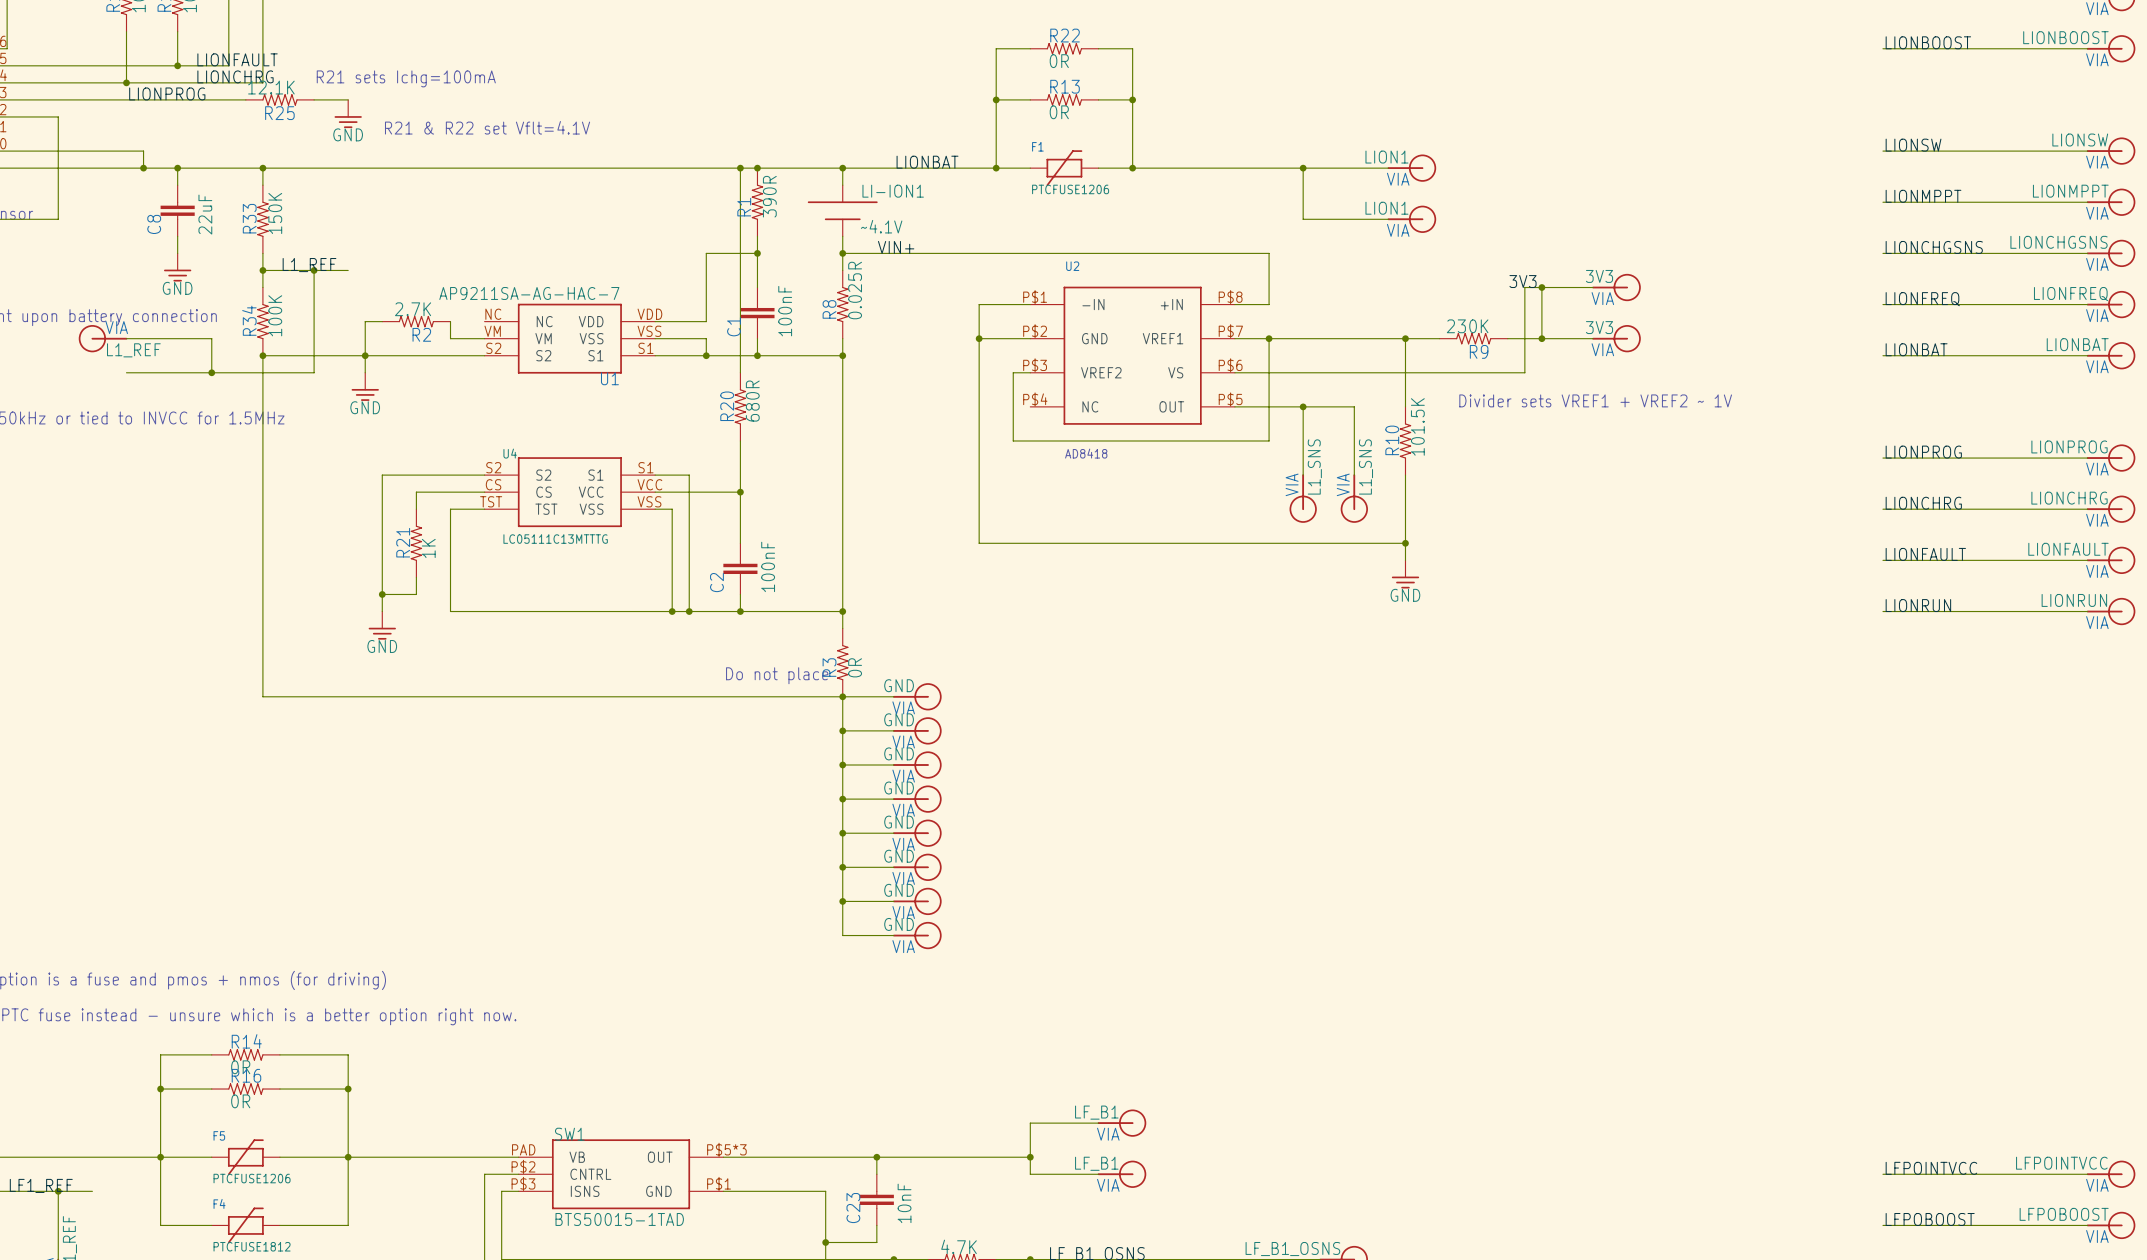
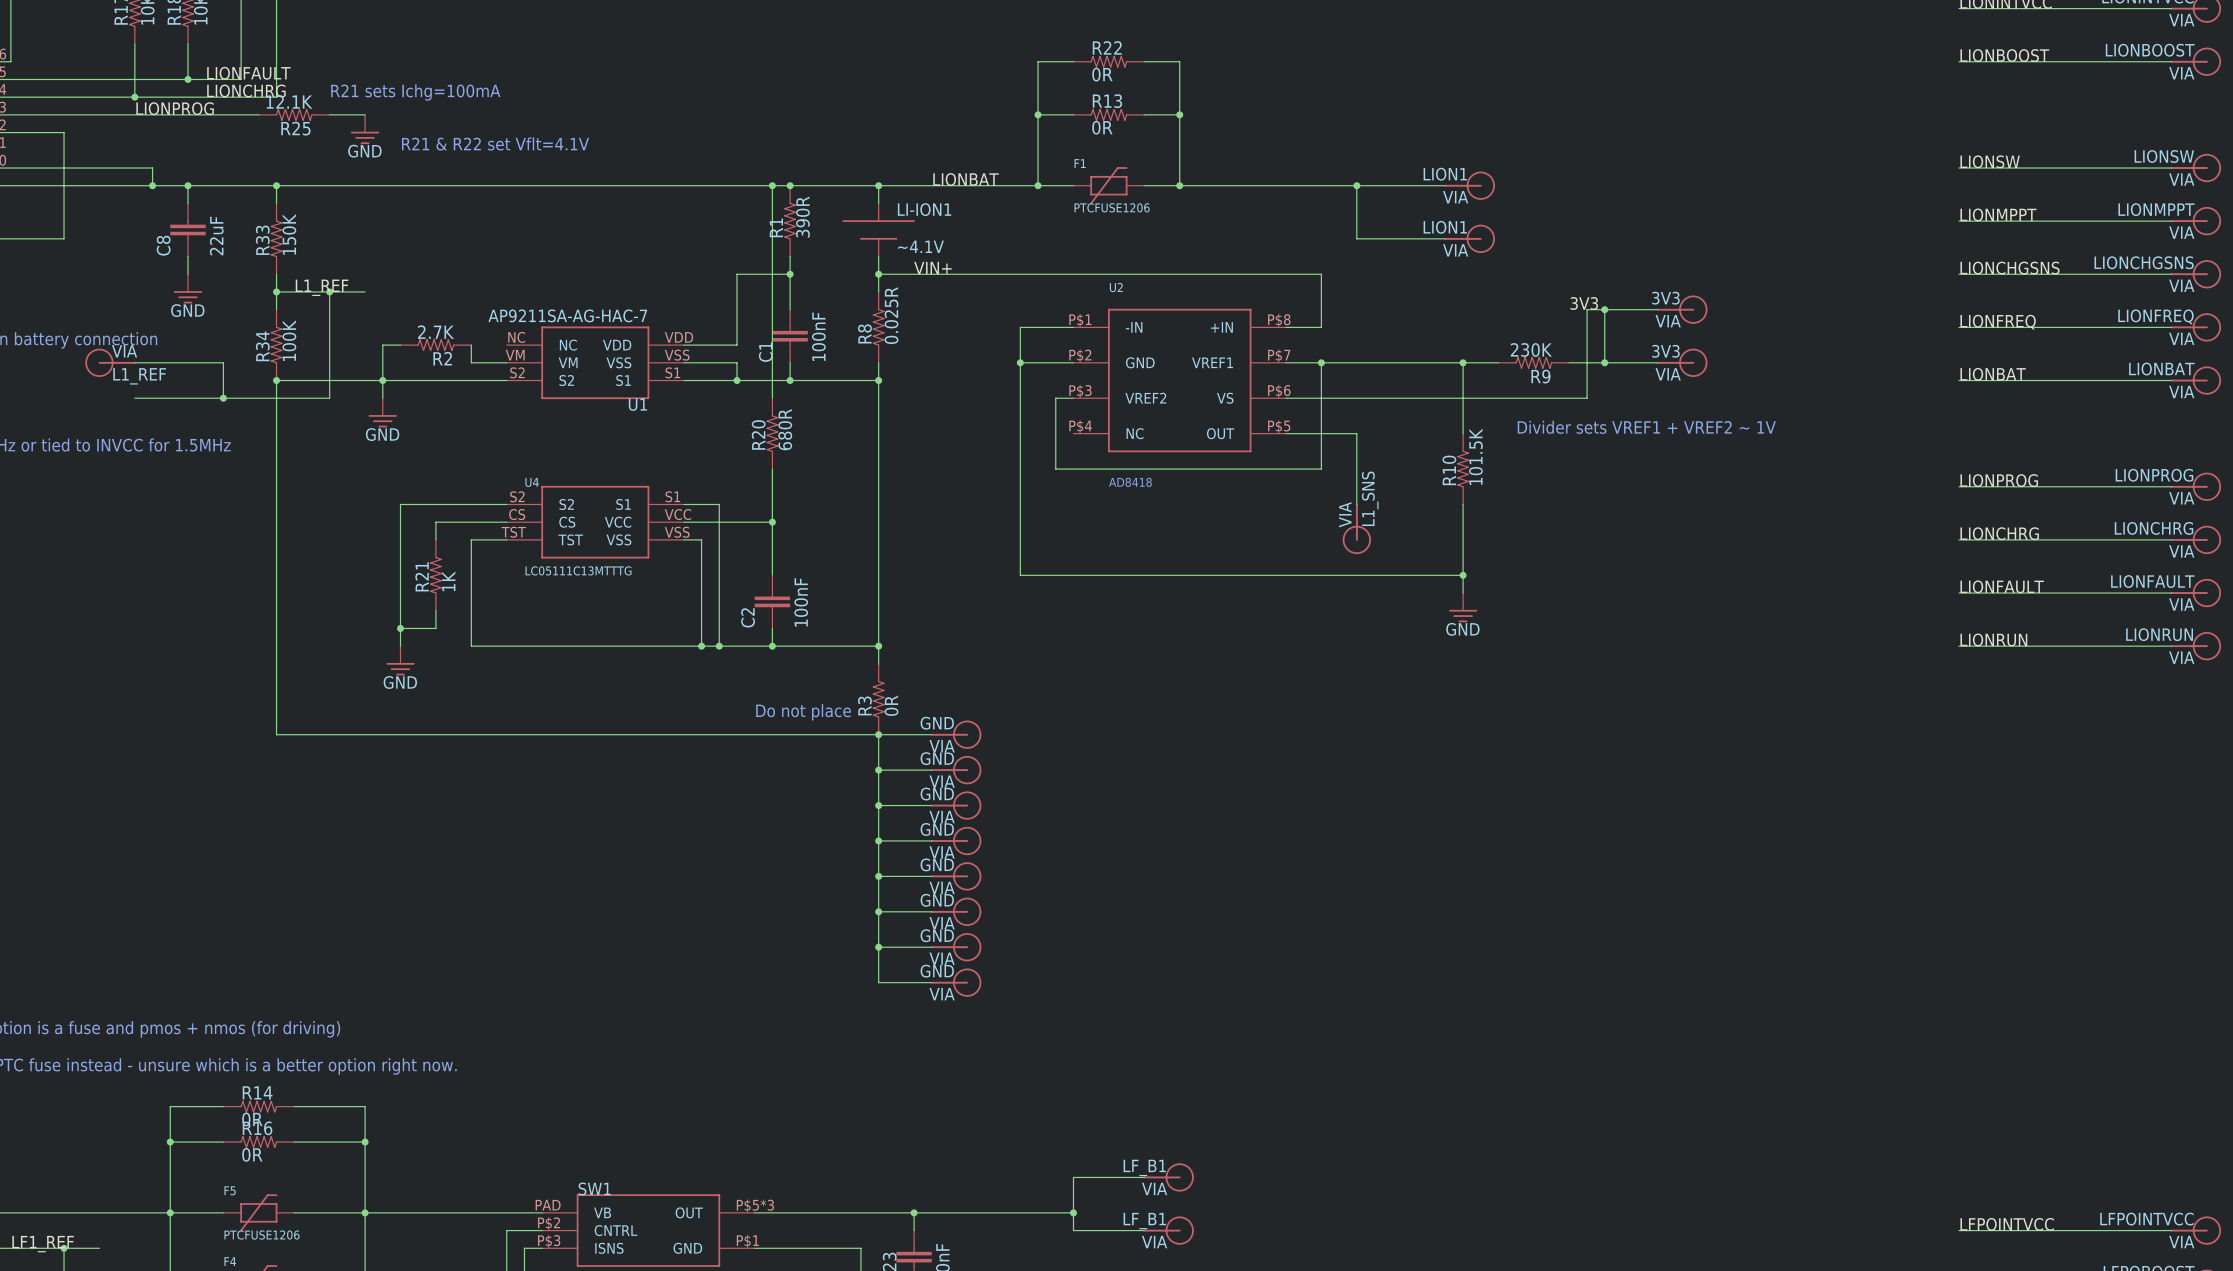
wire: (1303, 406) (1354, 406) (1354, 475) -> none
junction: (1303, 406) -> none
part: L1_SNS (1354, 498) -> none

